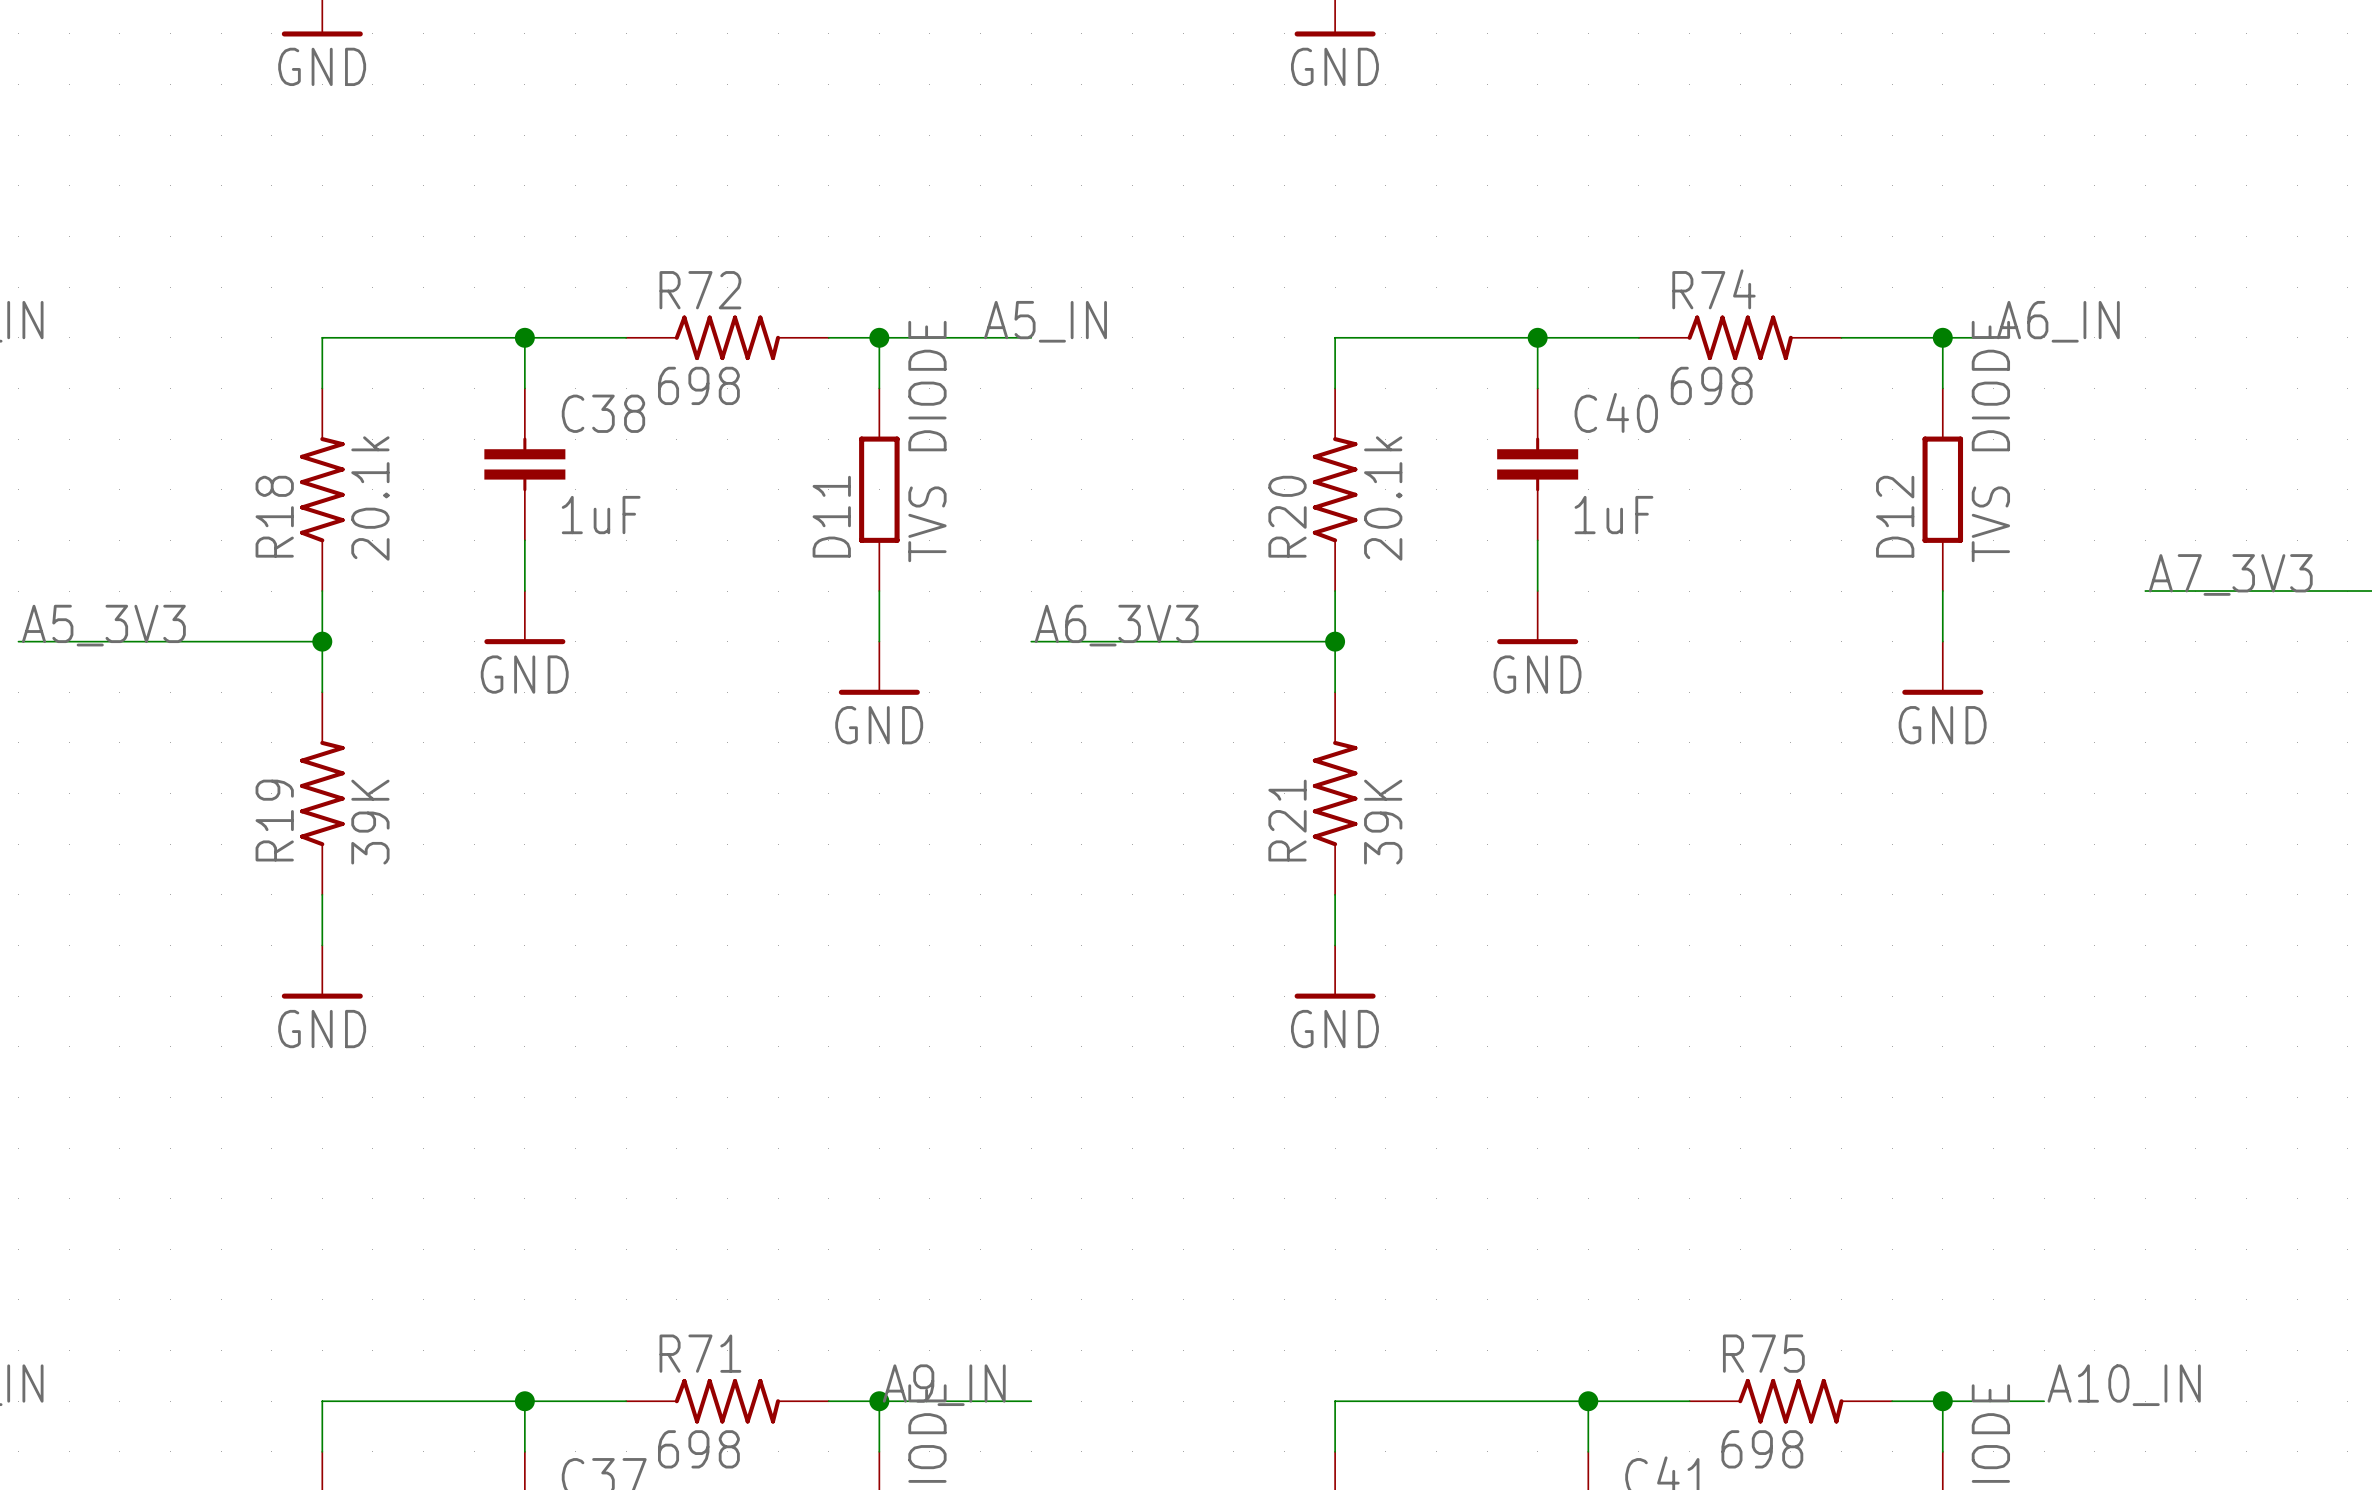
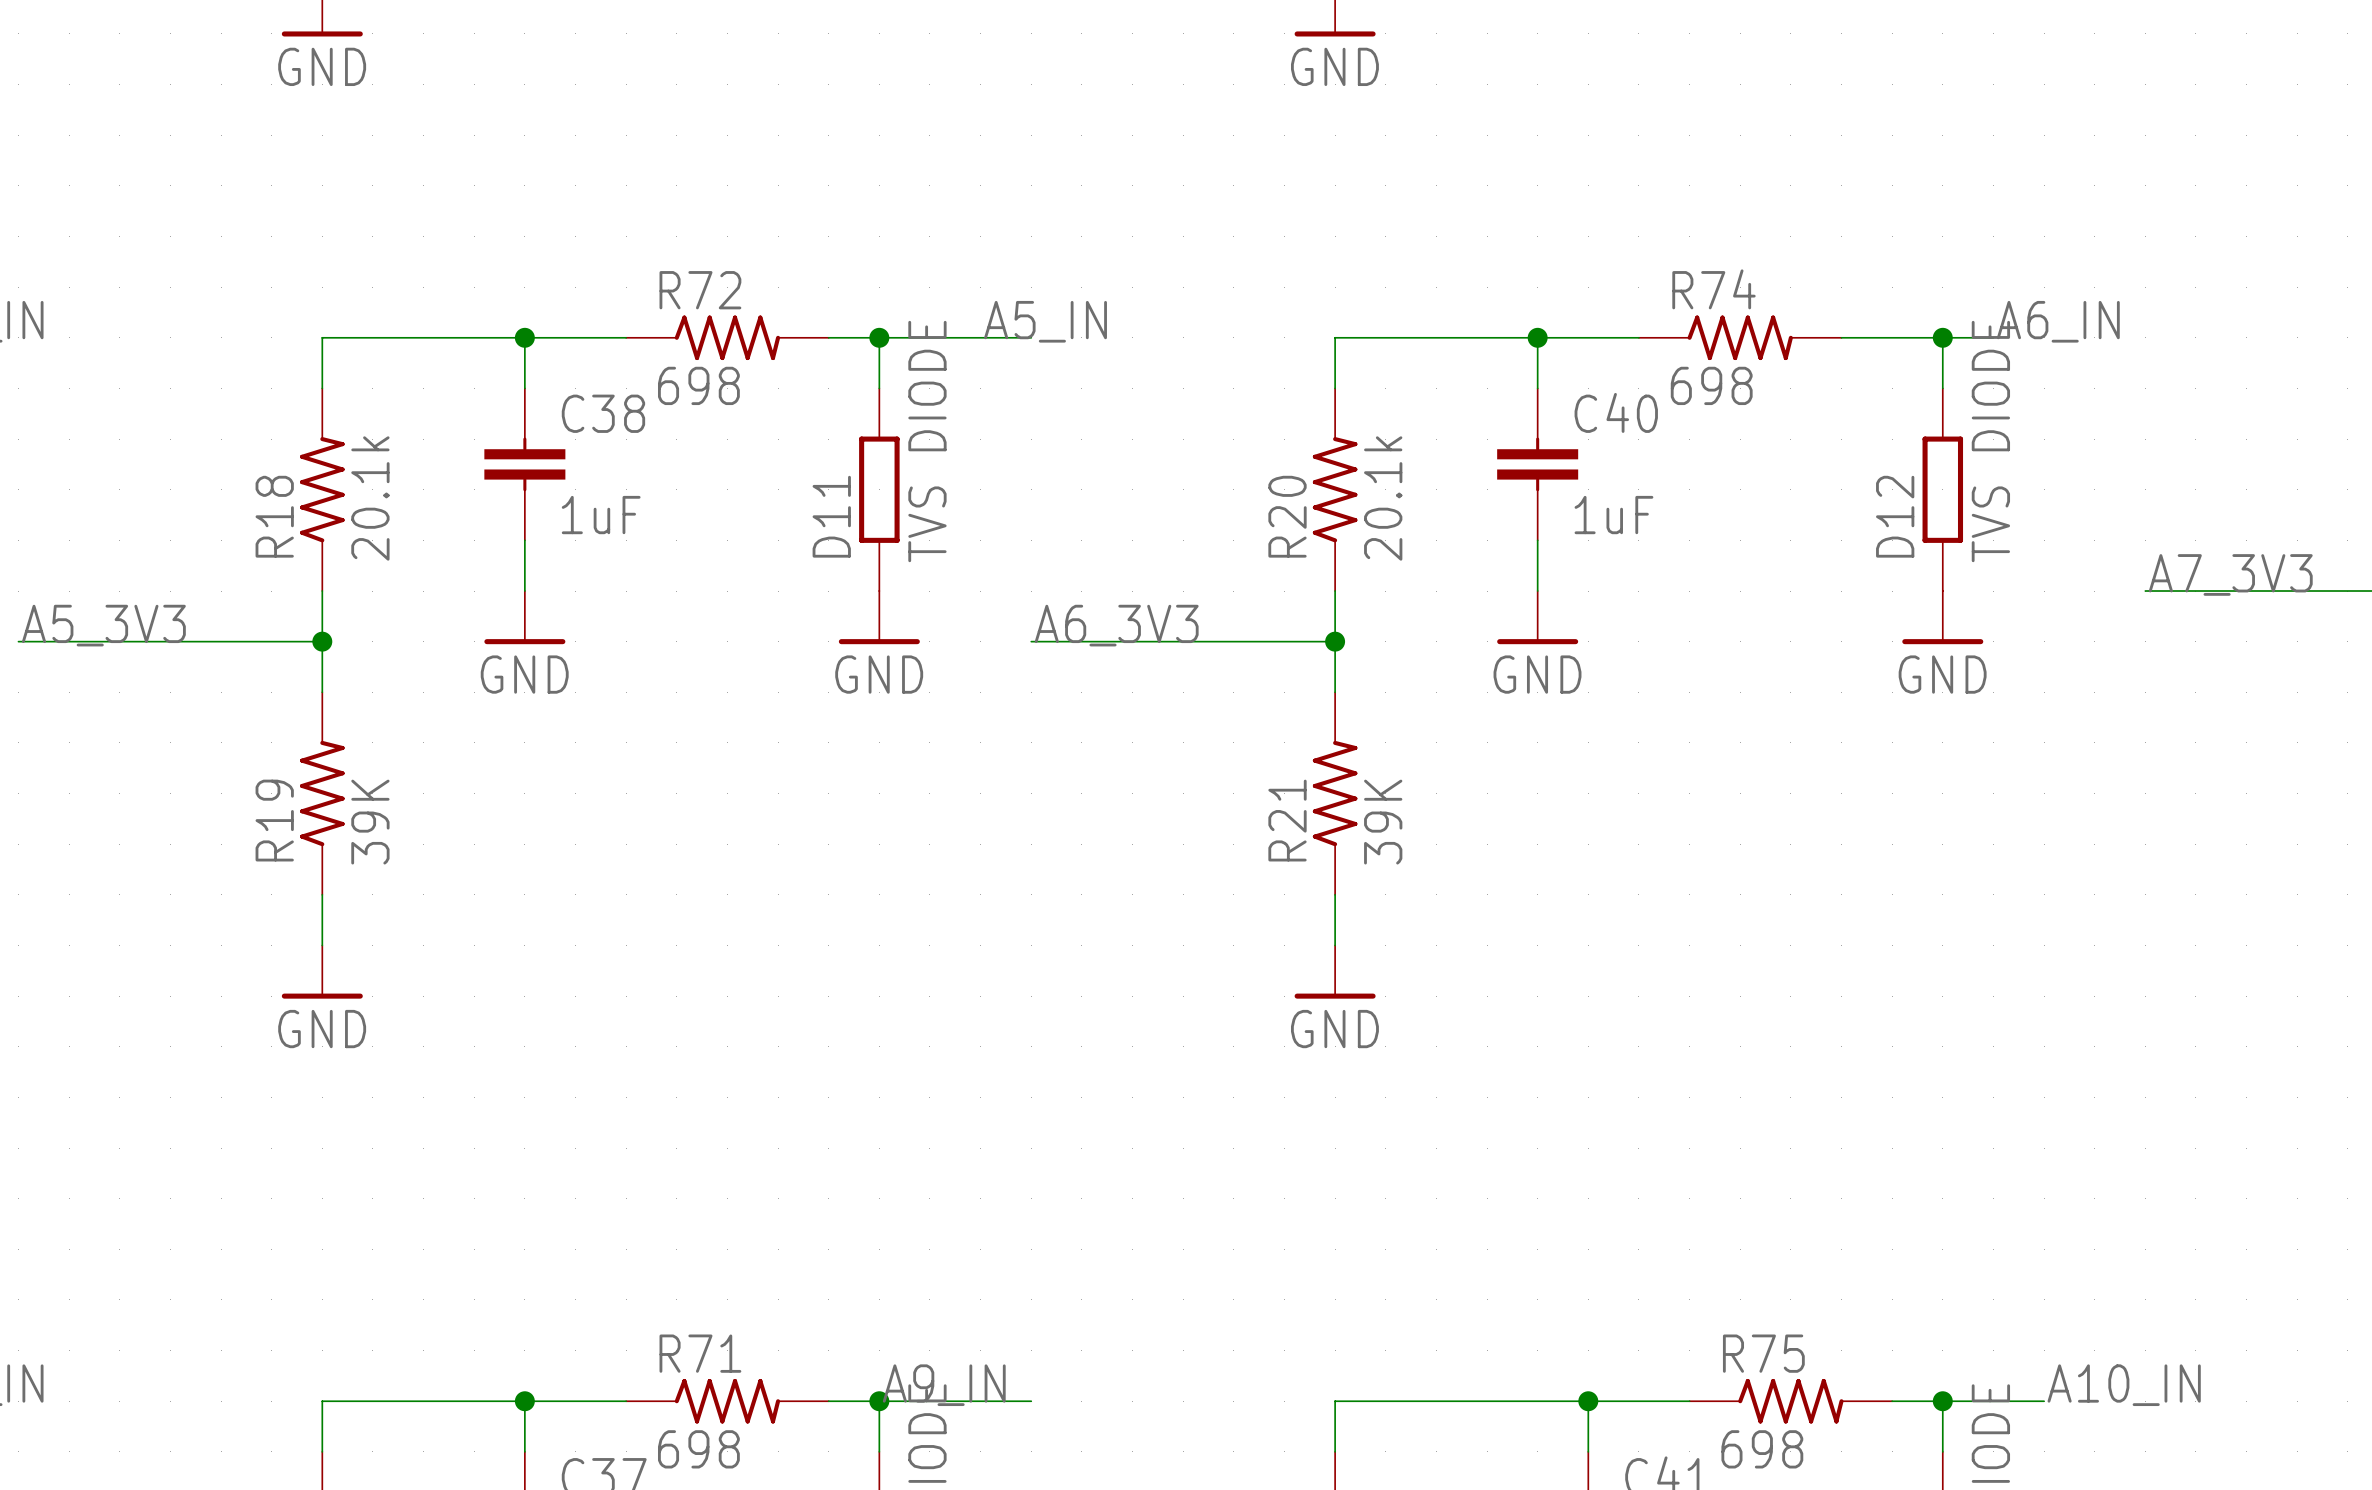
power symbol position: GND (879, 668) -> GND (879, 617)
power symbol position: GND (1942, 668) -> GND (1942, 617)

